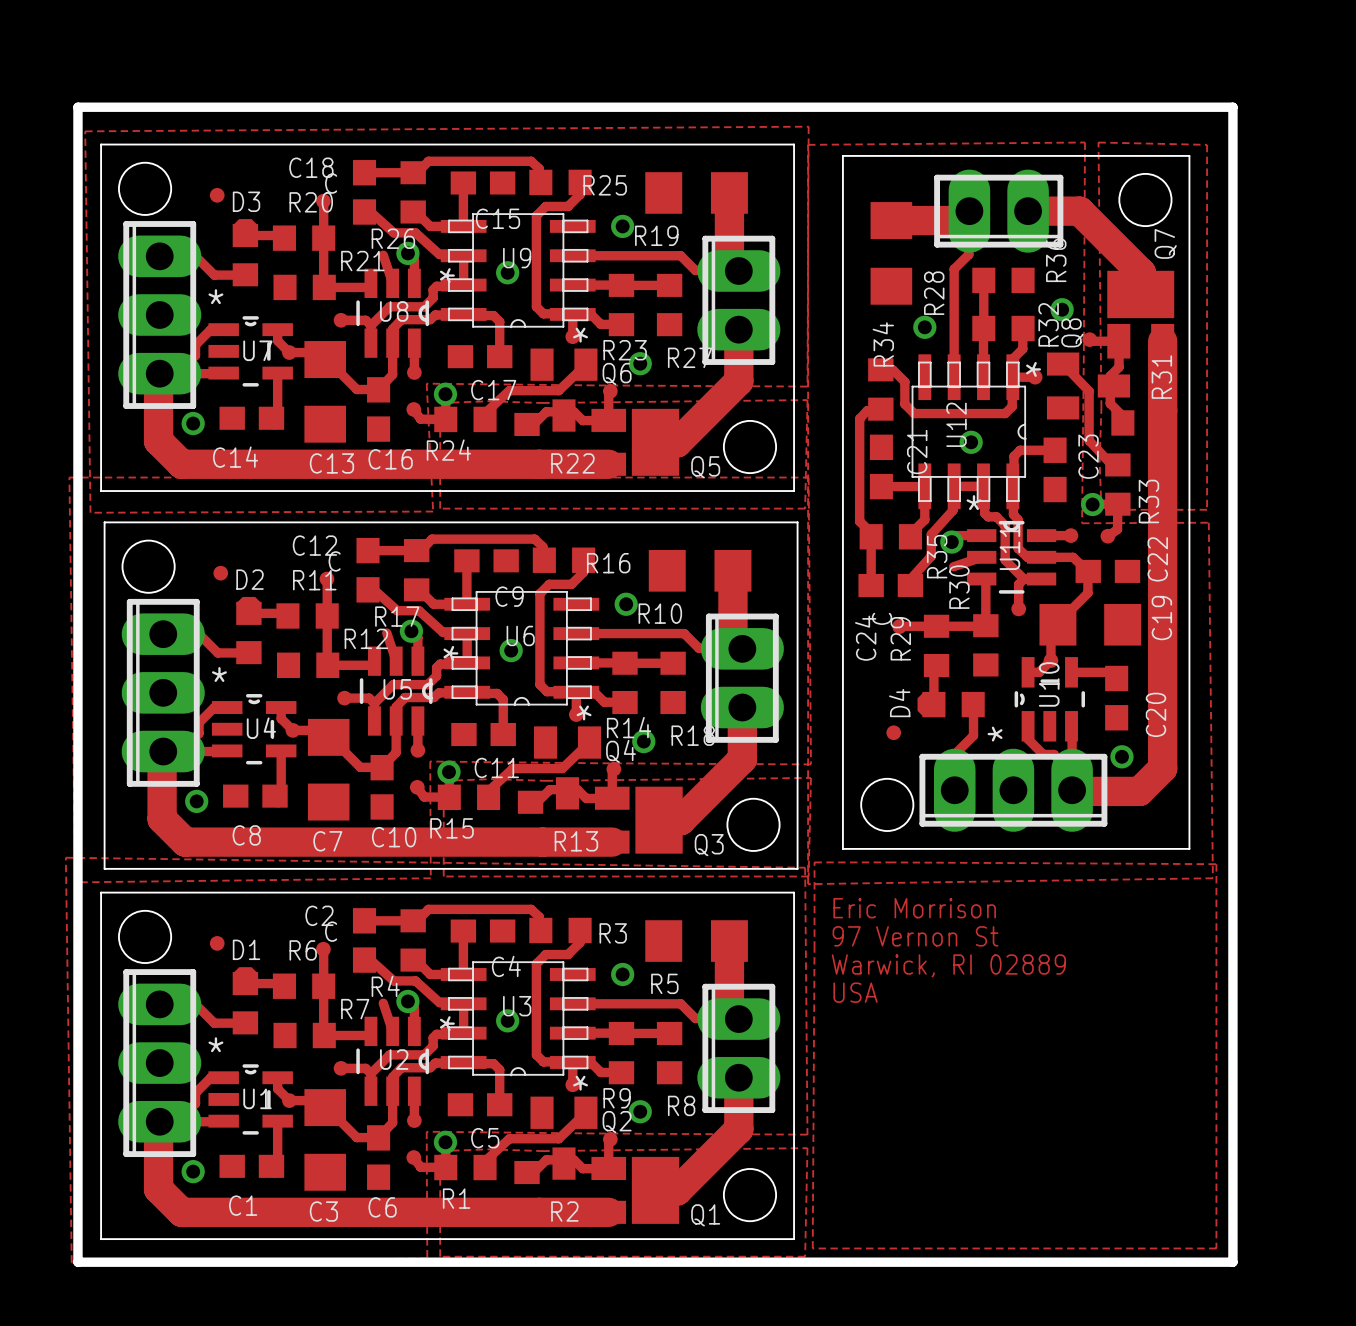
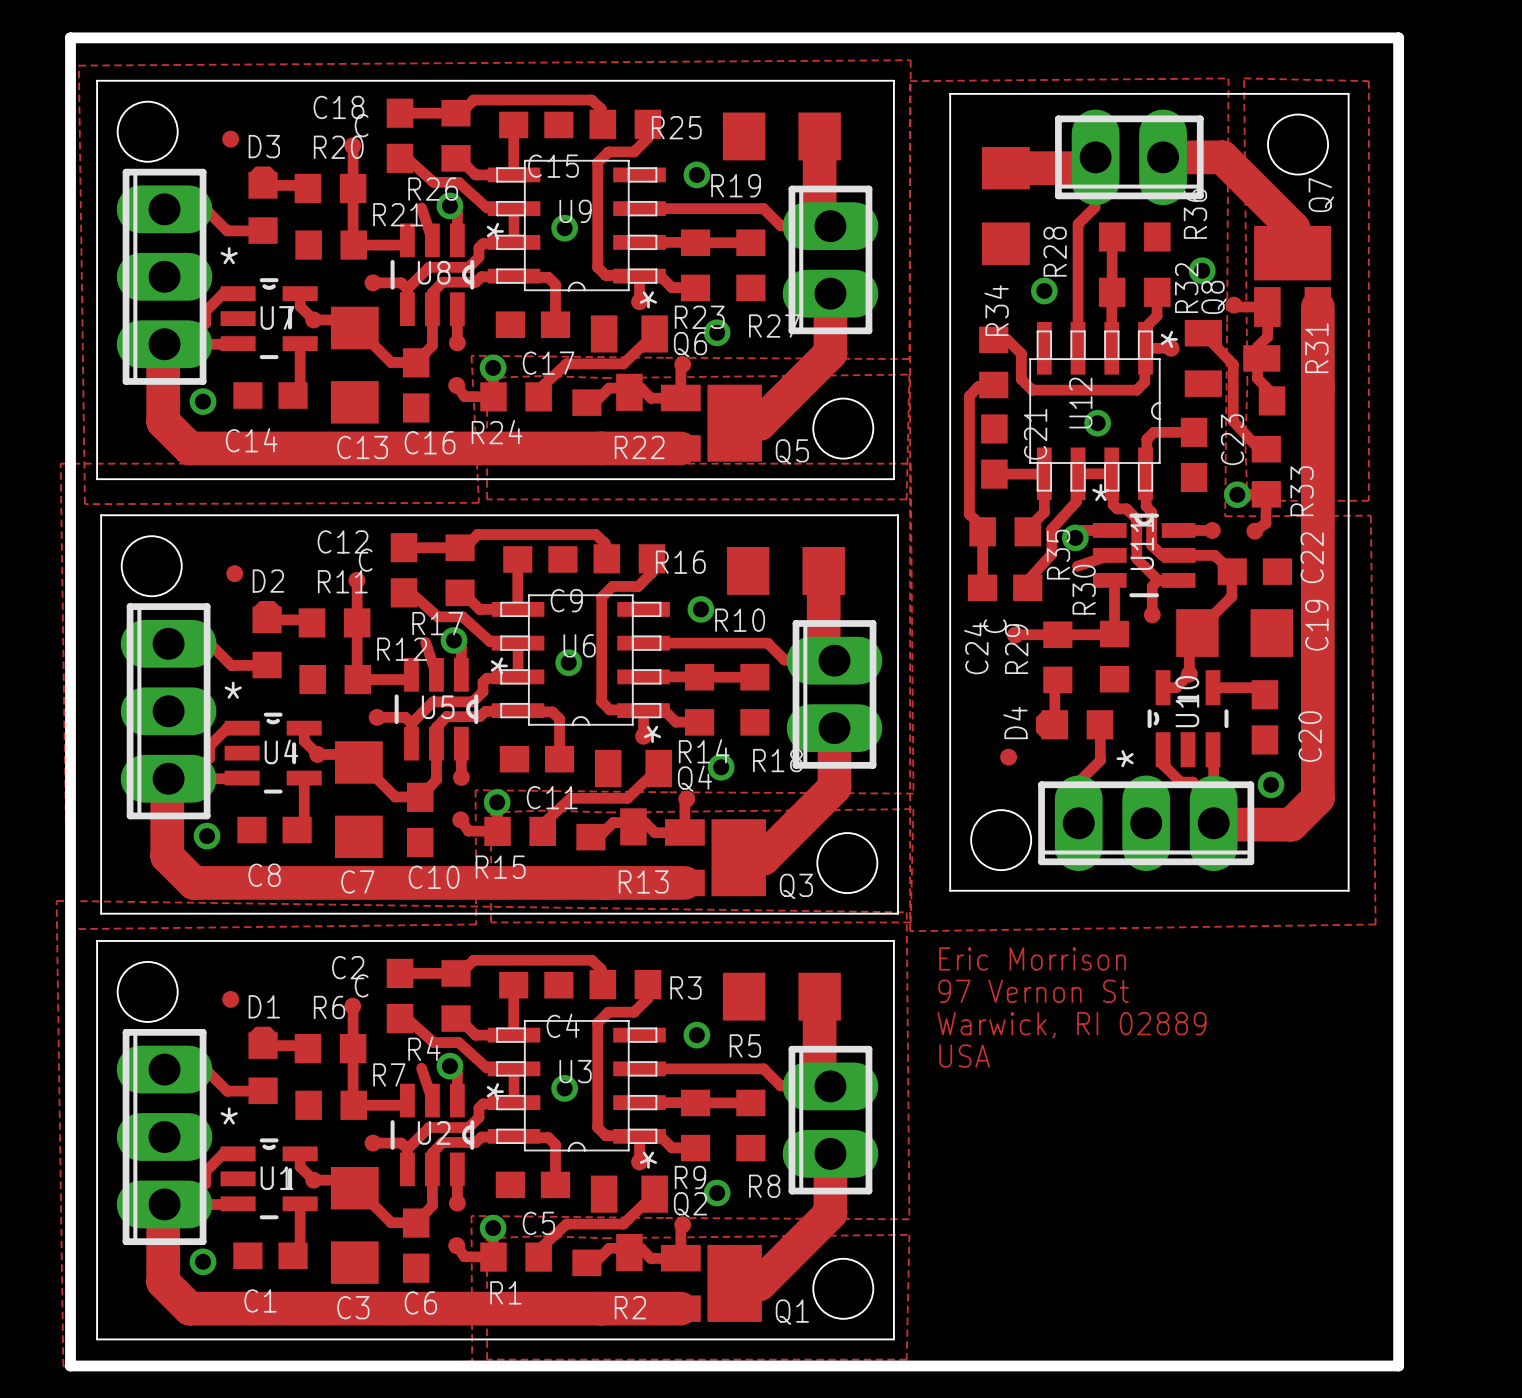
zone outline: (814, 862) (812, 1248) (1216, 1248) (1216, 864) (814, 862) -> none

